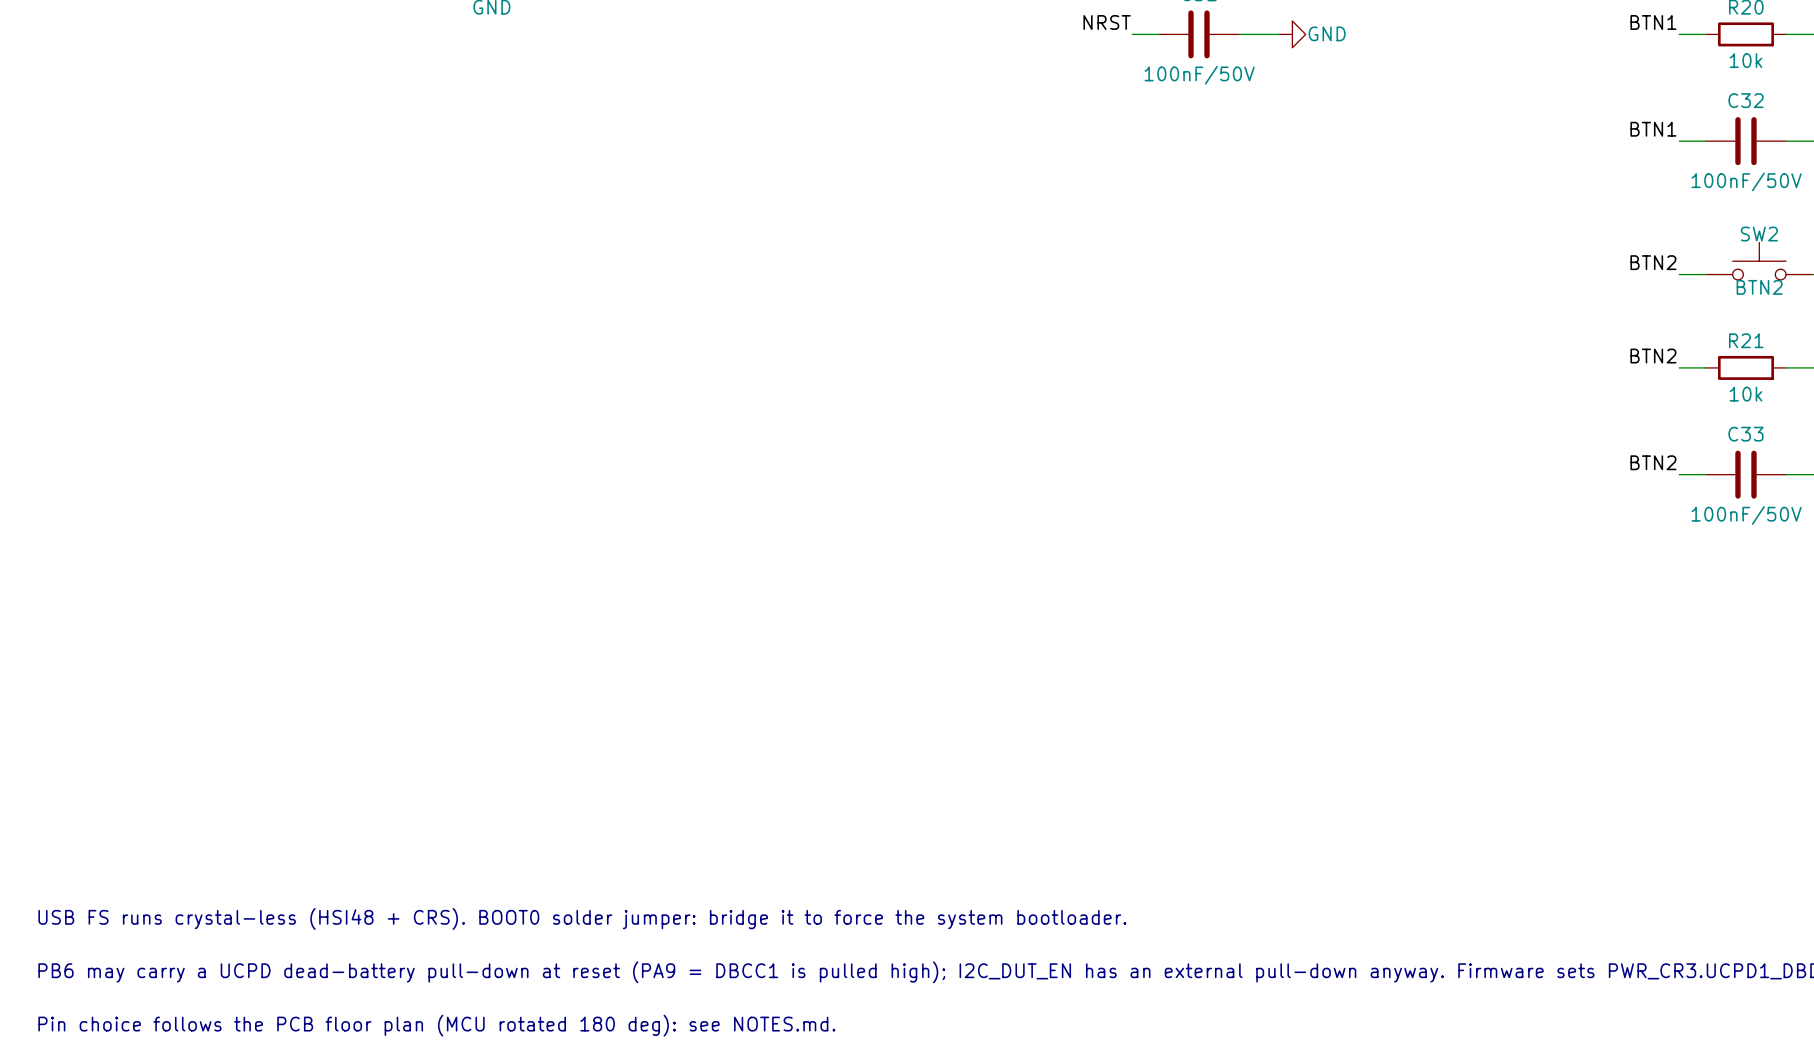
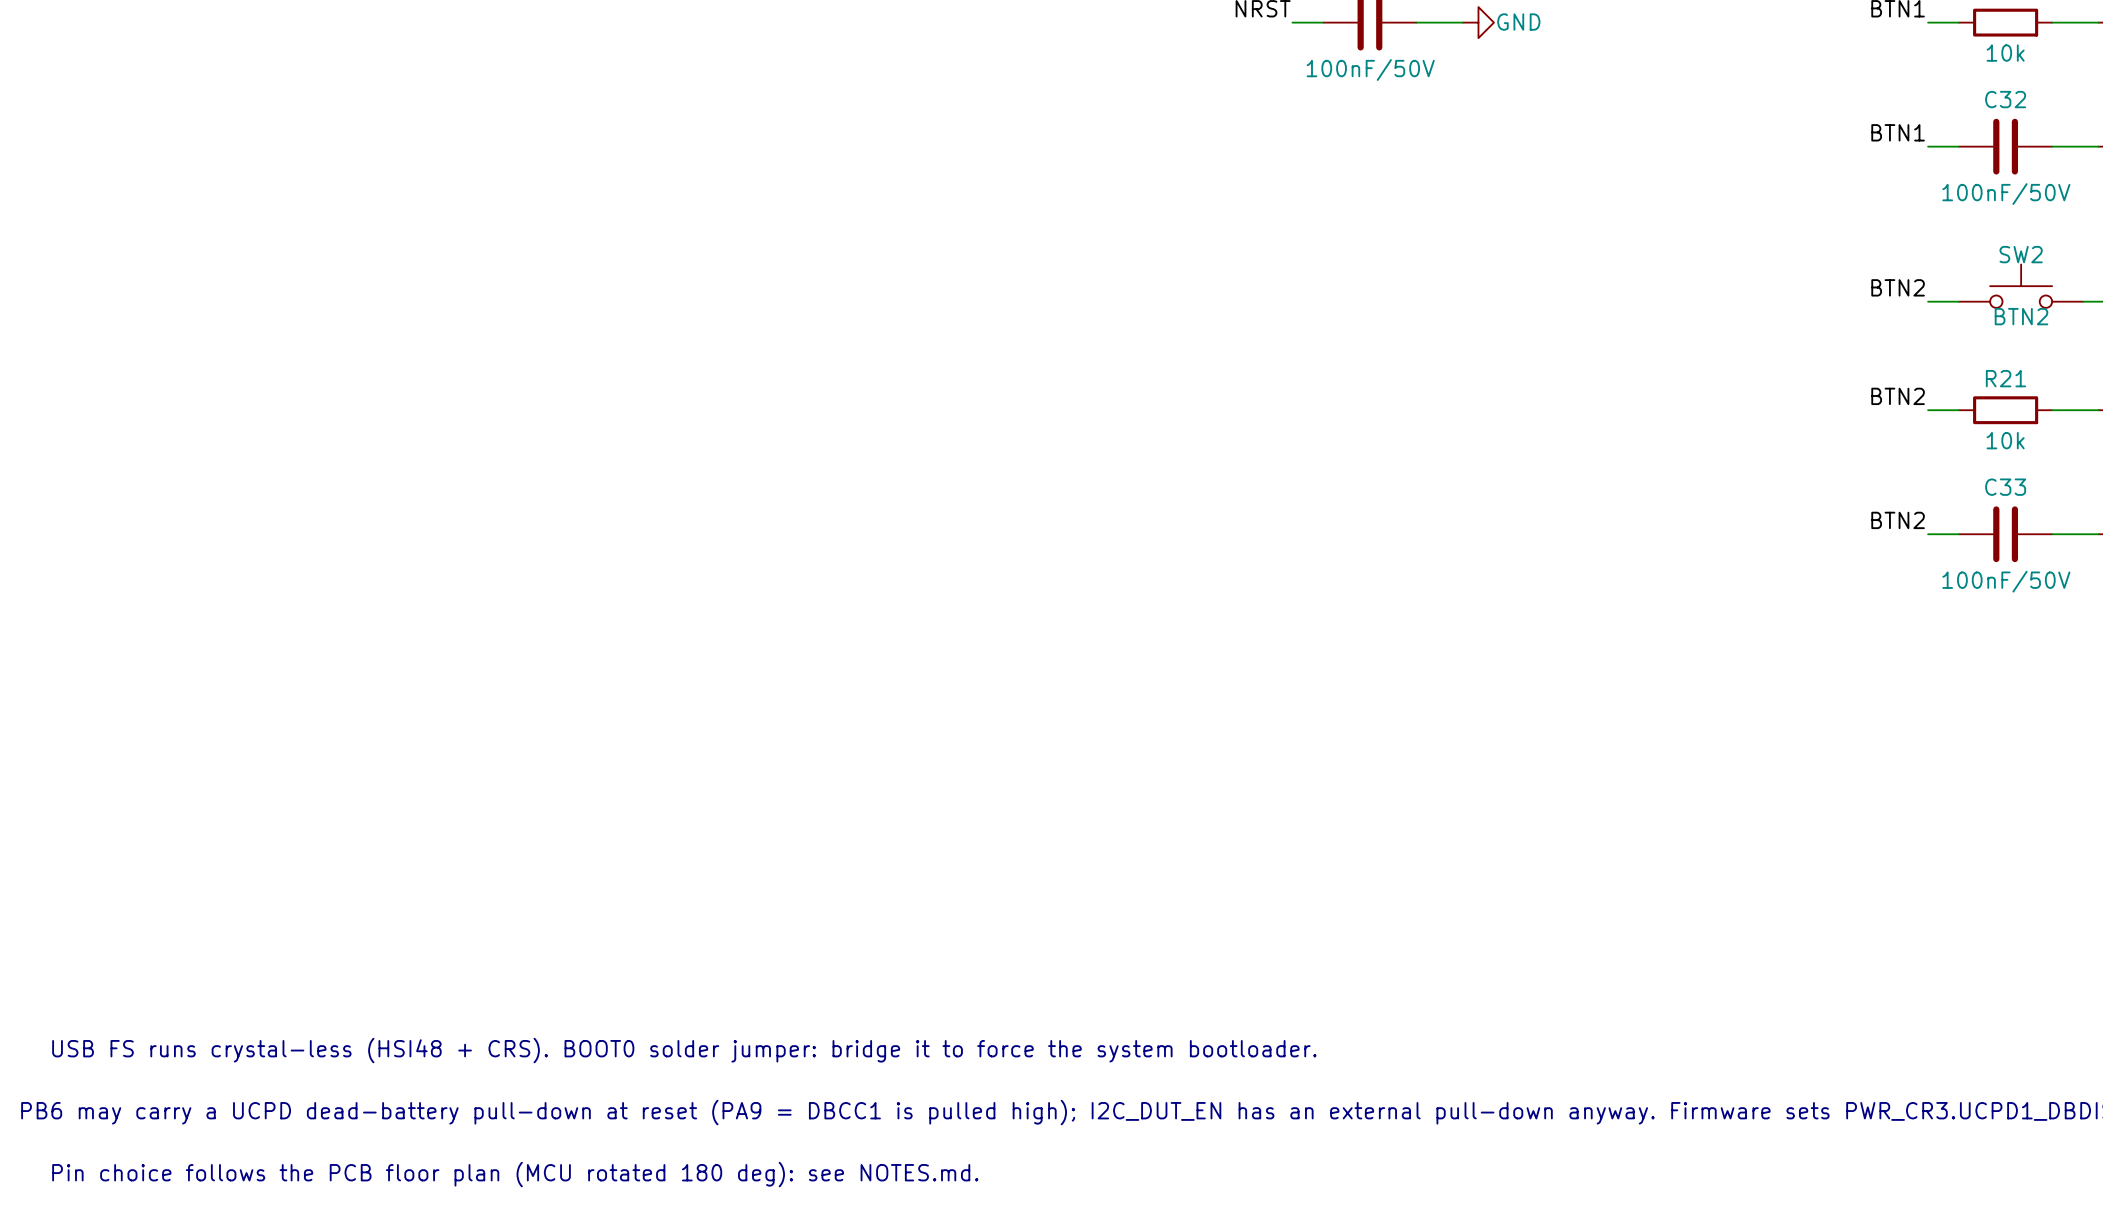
text position: USB FS runs crystal-less (HSI48 + CRS). BOOT0 solder jumper: bridge it to force the system bootloader. (582, 918) -> USB FS runs crystal-less (HSI48 + CRS). BOOT0 solder jumper: bridge it to force the system bootloader. (684, 1050)
text position: Pin choice follows the PCB floor plan (MCU rotated 180 deg): see NOTES.md. (436, 1025) -> Pin choice follows the PCB floor plan (MCU rotated 180 deg): see NOTES.md. (515, 1174)

